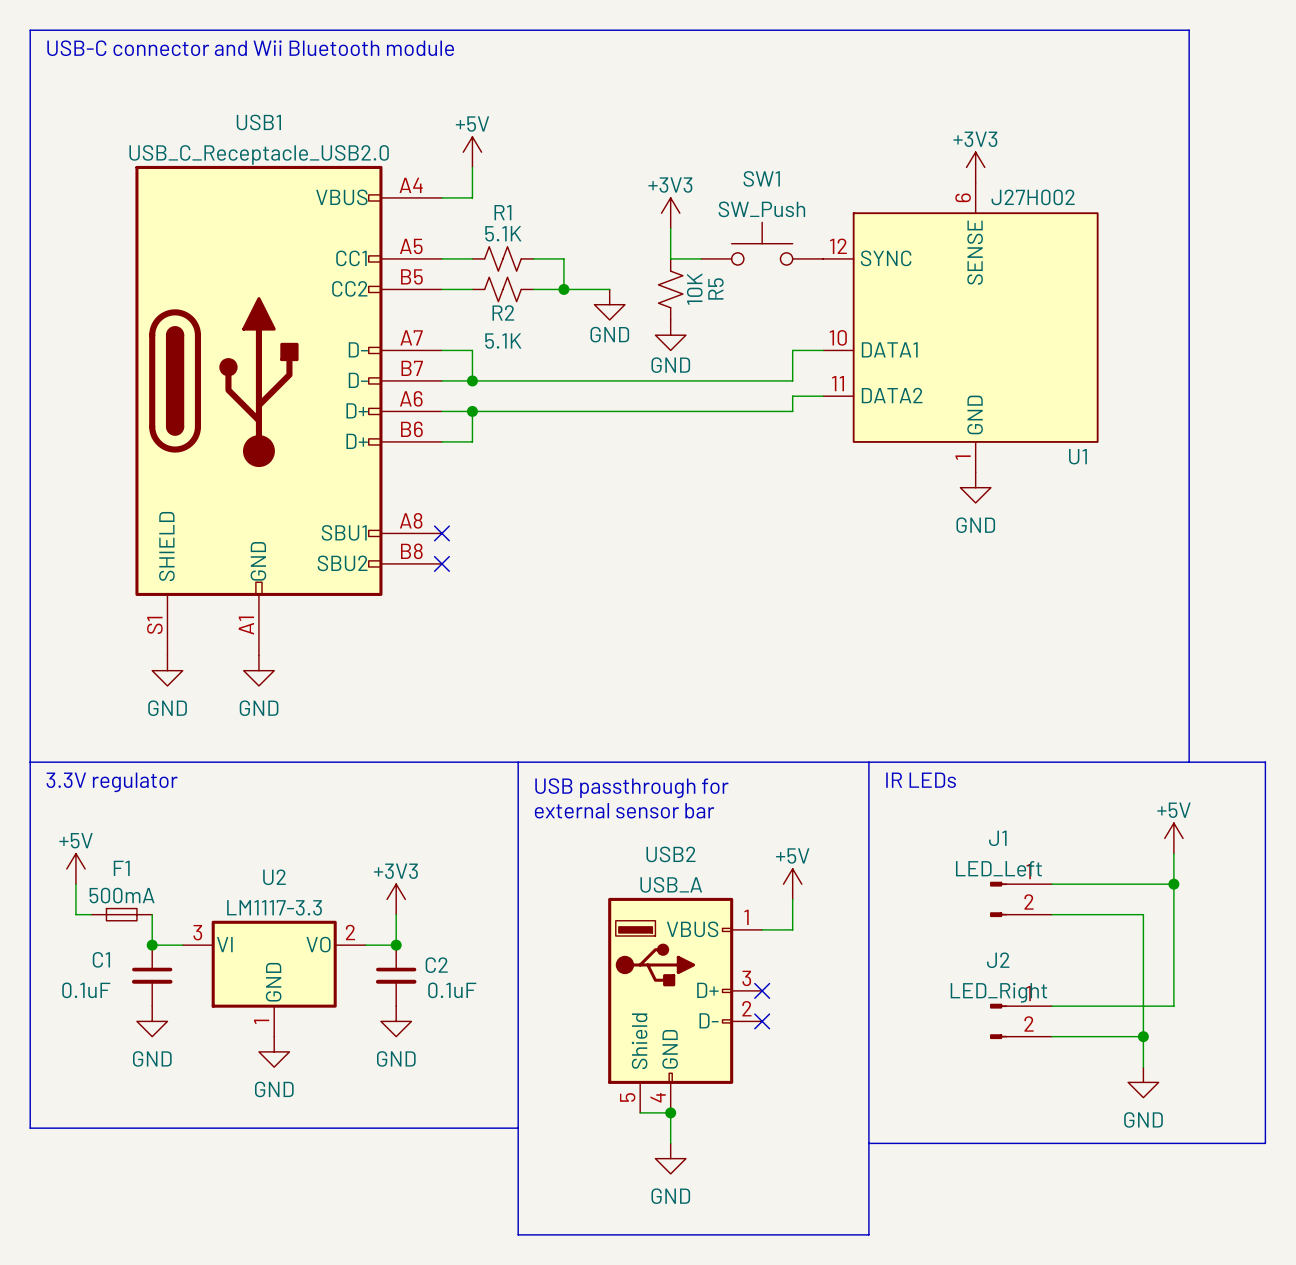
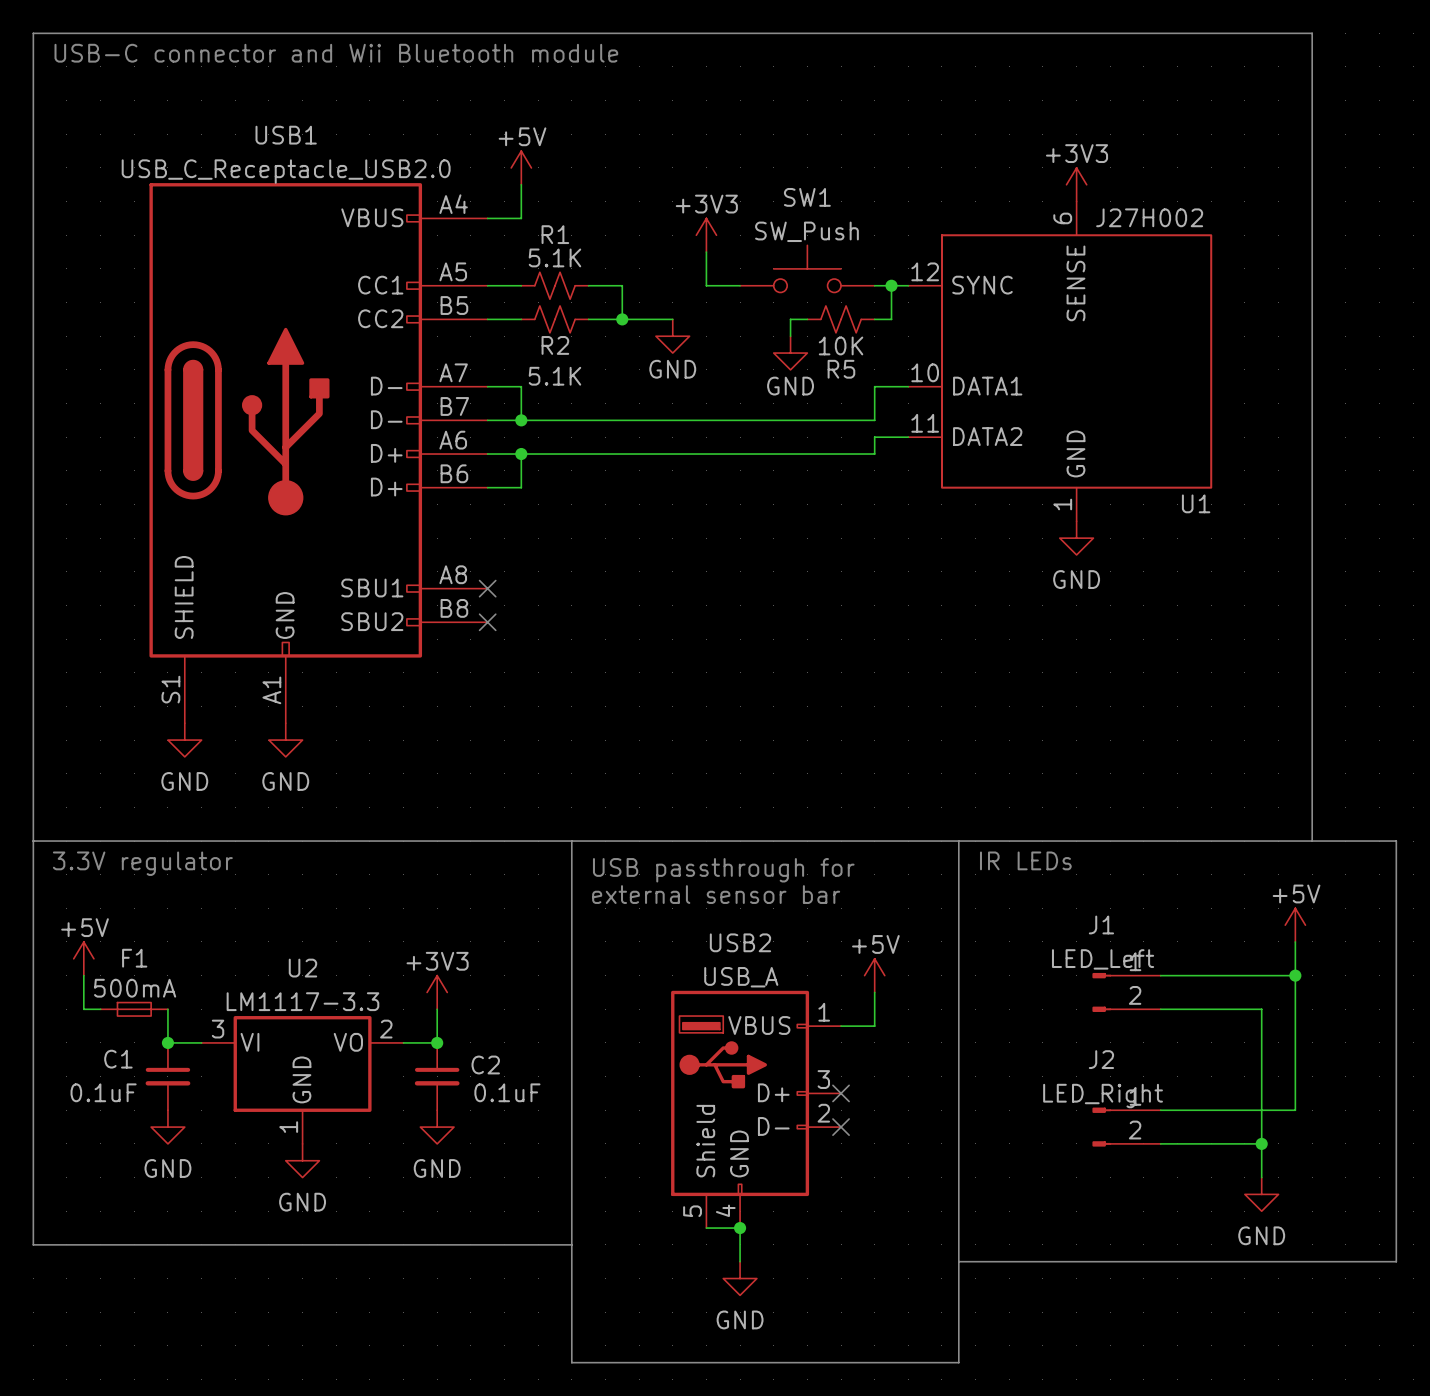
power symbol position: +3V3 (670, 213) -> +3V3 (706, 235)
wire: (670, 228) (670, 258) (701, 258) -> (706, 252) (706, 285) (740, 285)
SW1 position: (762, 243) -> (807, 268)
wire: none -> (891, 285) (891, 319) (874, 319)
junction: none -> (891, 285)
R5 rotation: 0° (670, 289) -> 90° clockwise (841, 319)
R5 position: (670, 289) -> (841, 319)
wire: none -> (807, 319) (790, 319) (790, 336)
power symbol position: GND (670, 335) -> GND (790, 353)

